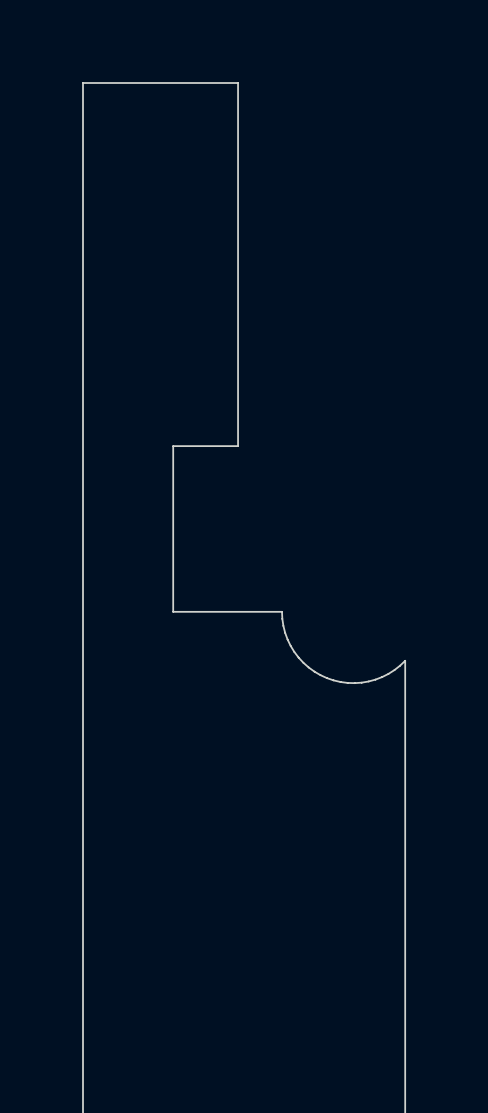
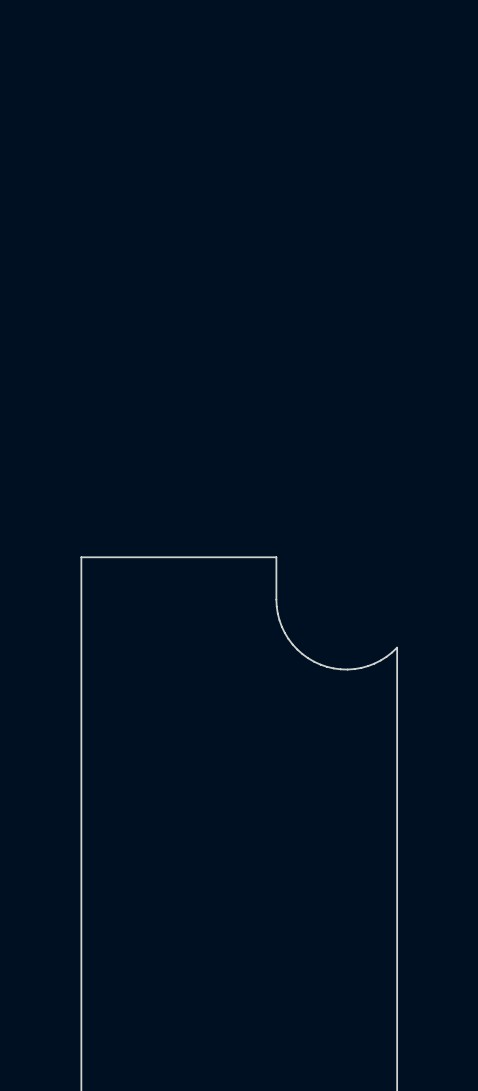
board edge: (83, 568) (83, 83) (238, 83) (238, 446) (173, 446) (173, 611) (281, 611) -> (81, 557) (276, 557) (276, 599)

